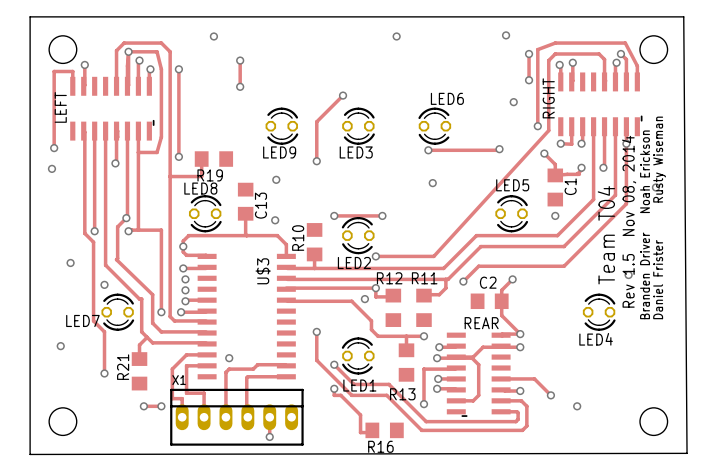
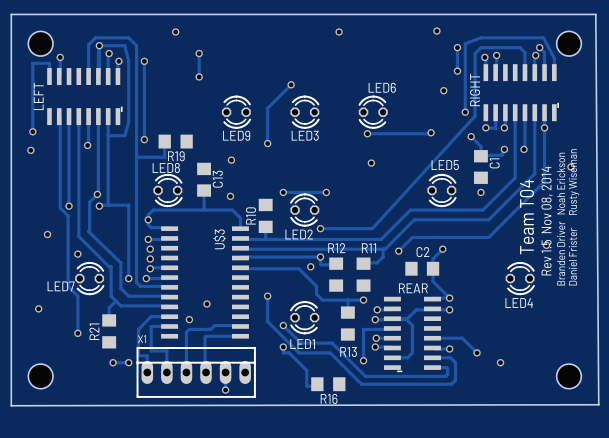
via: none -> (206, 303)

